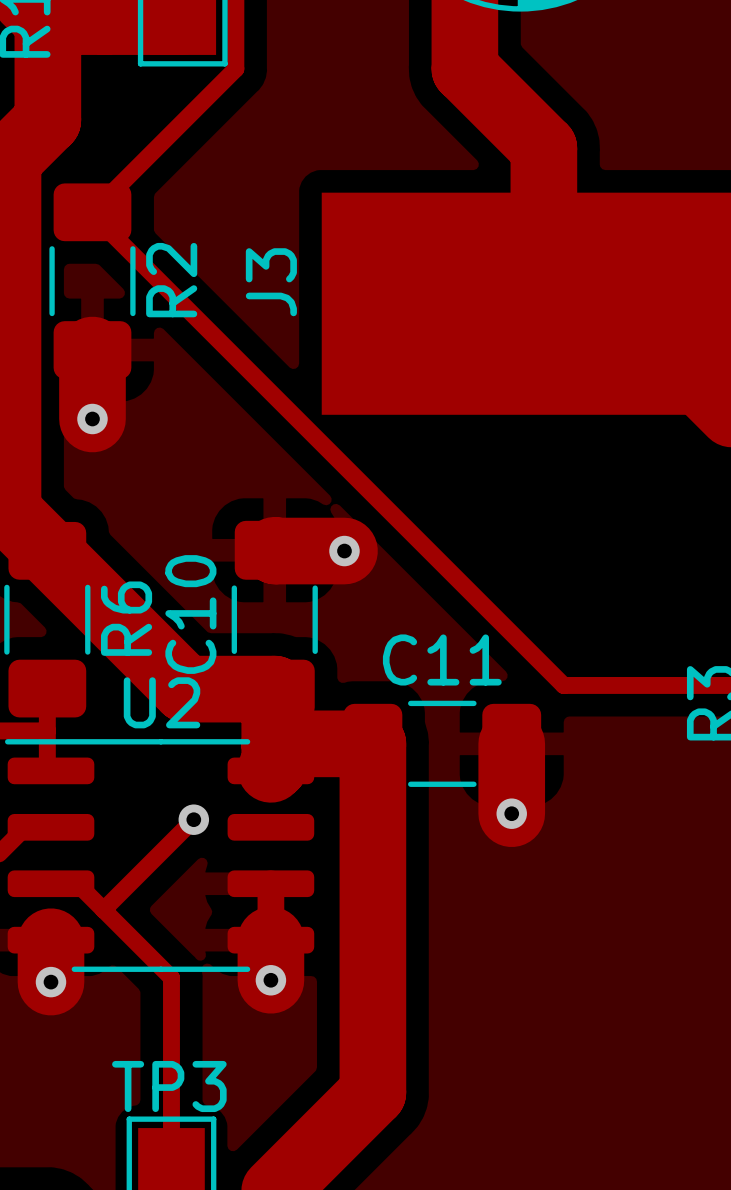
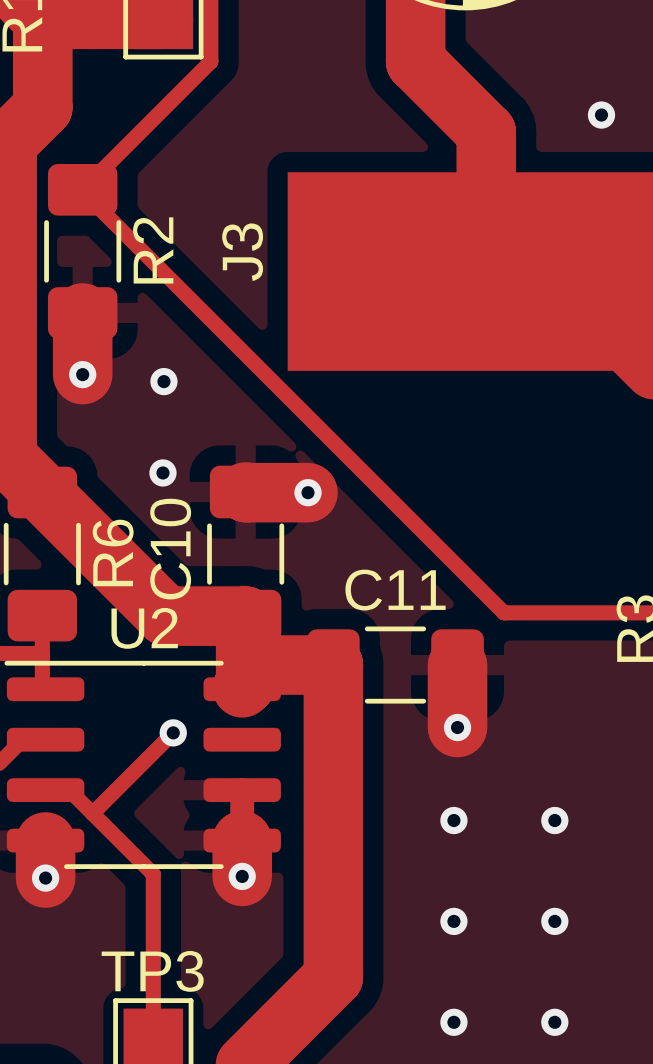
via: none -> (601, 115)
via: none -> (163, 381)
via: none -> (162, 472)
via: none -> (453, 820)
via: none -> (554, 820)
via: none -> (453, 921)
via: none -> (554, 921)
via: none -> (453, 1022)
via: none -> (554, 1022)

